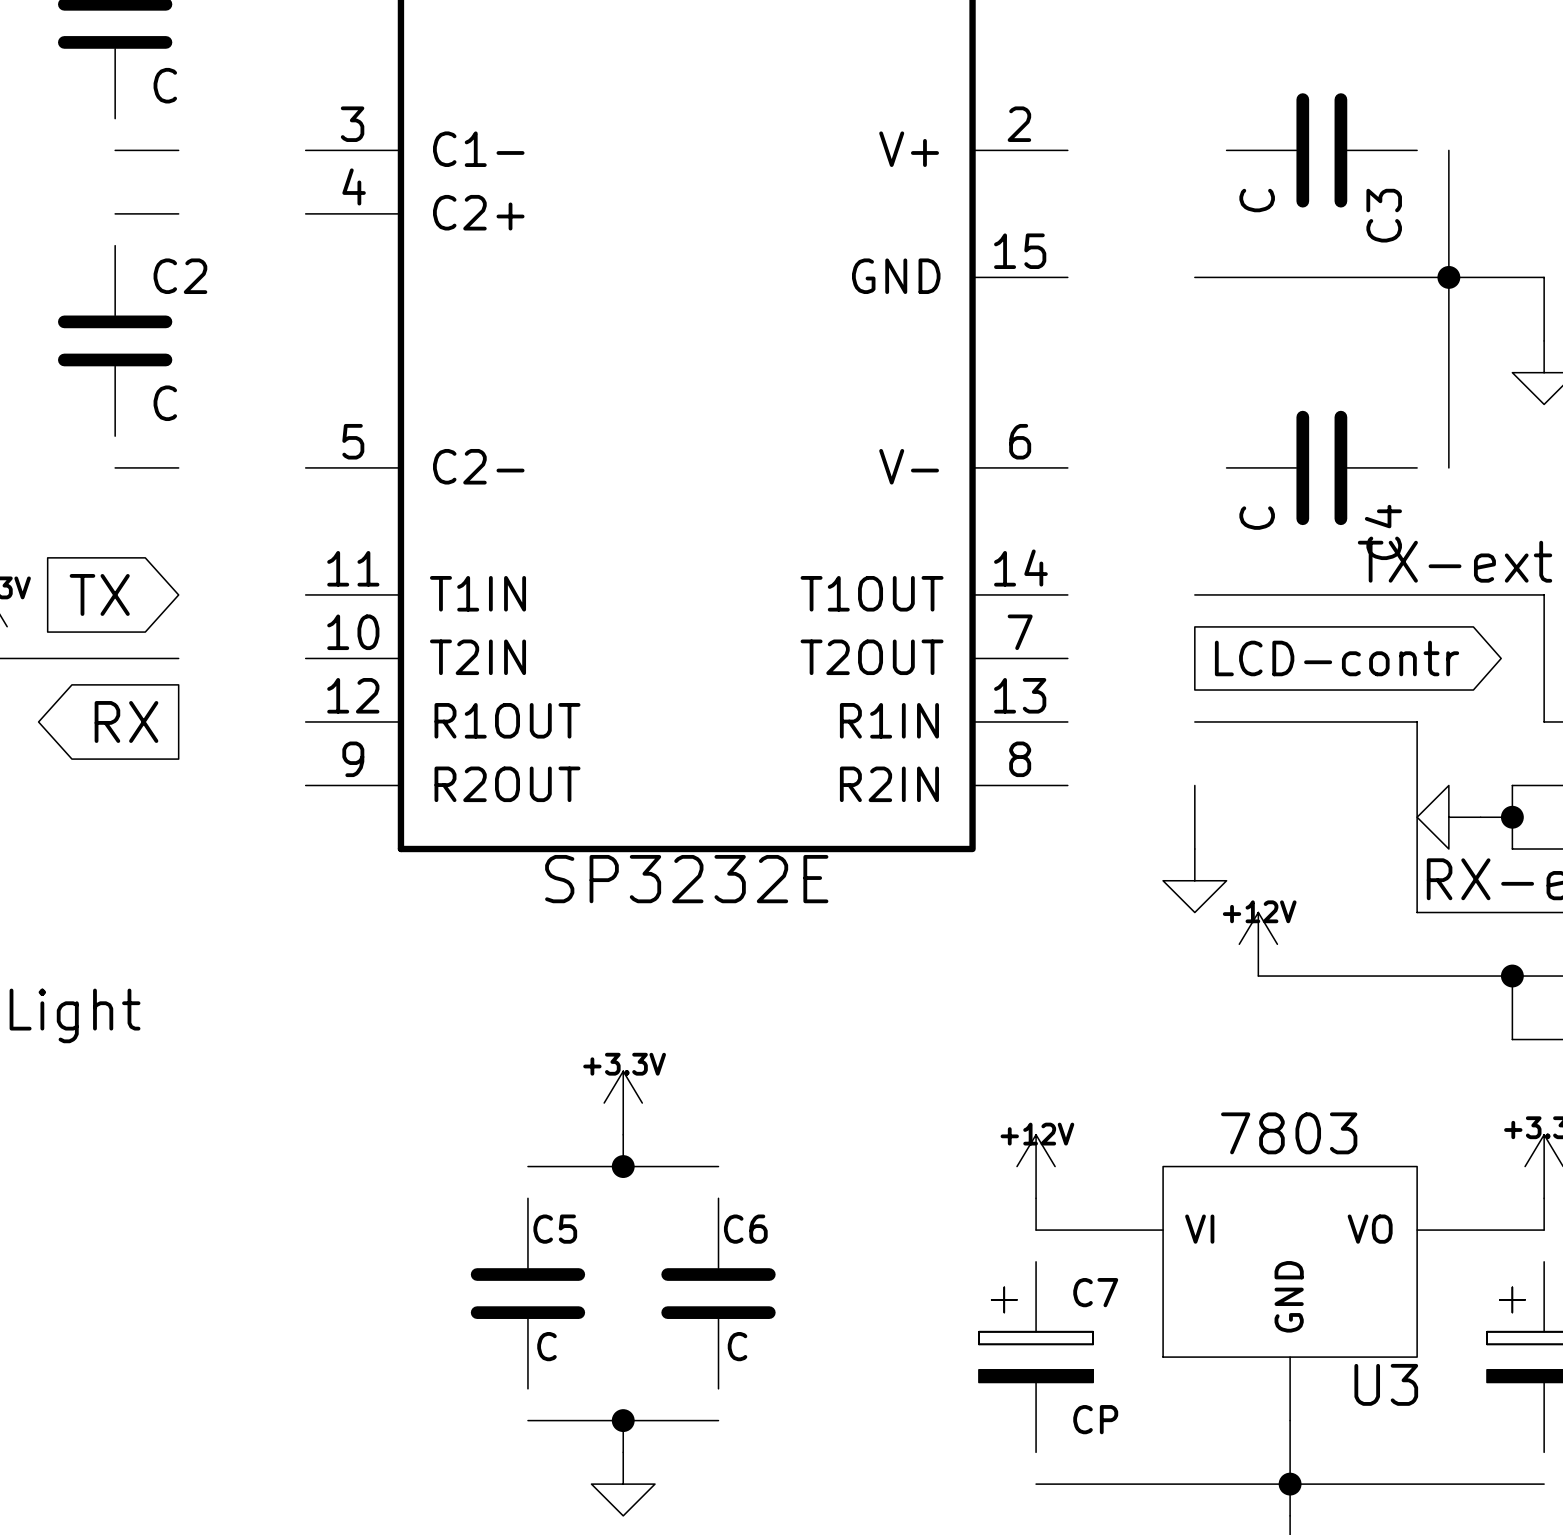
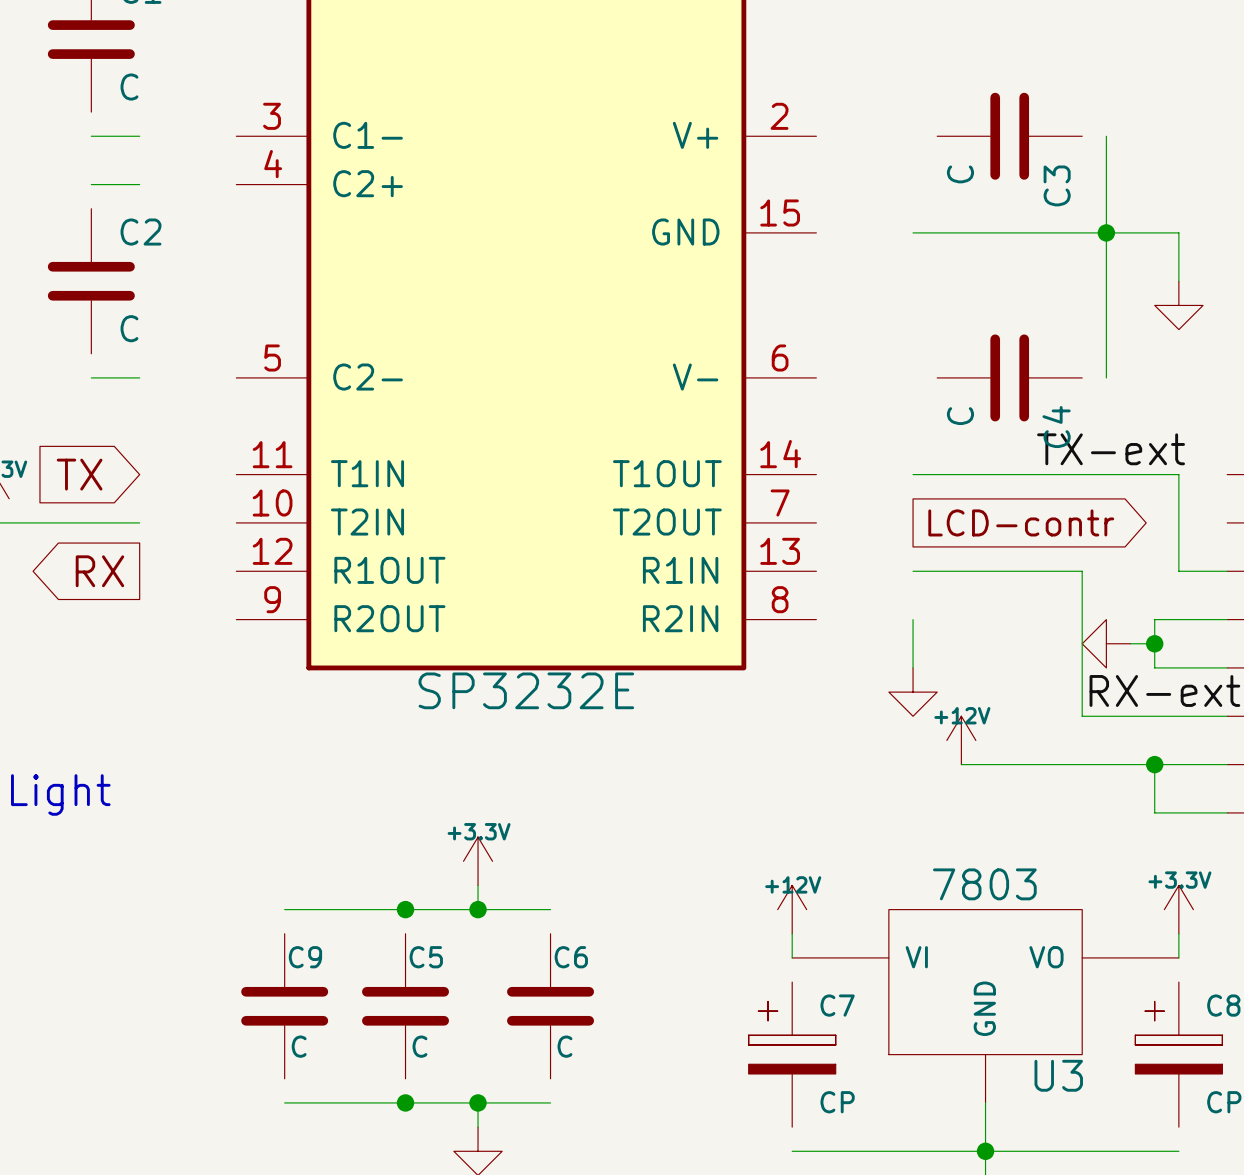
wire: none -> (284, 909) (405, 909)
junction: none -> (405, 909)
C9: none -> C (284, 1006)
wire: none -> (284, 1102) (405, 1102)
junction: none -> (405, 1102)

